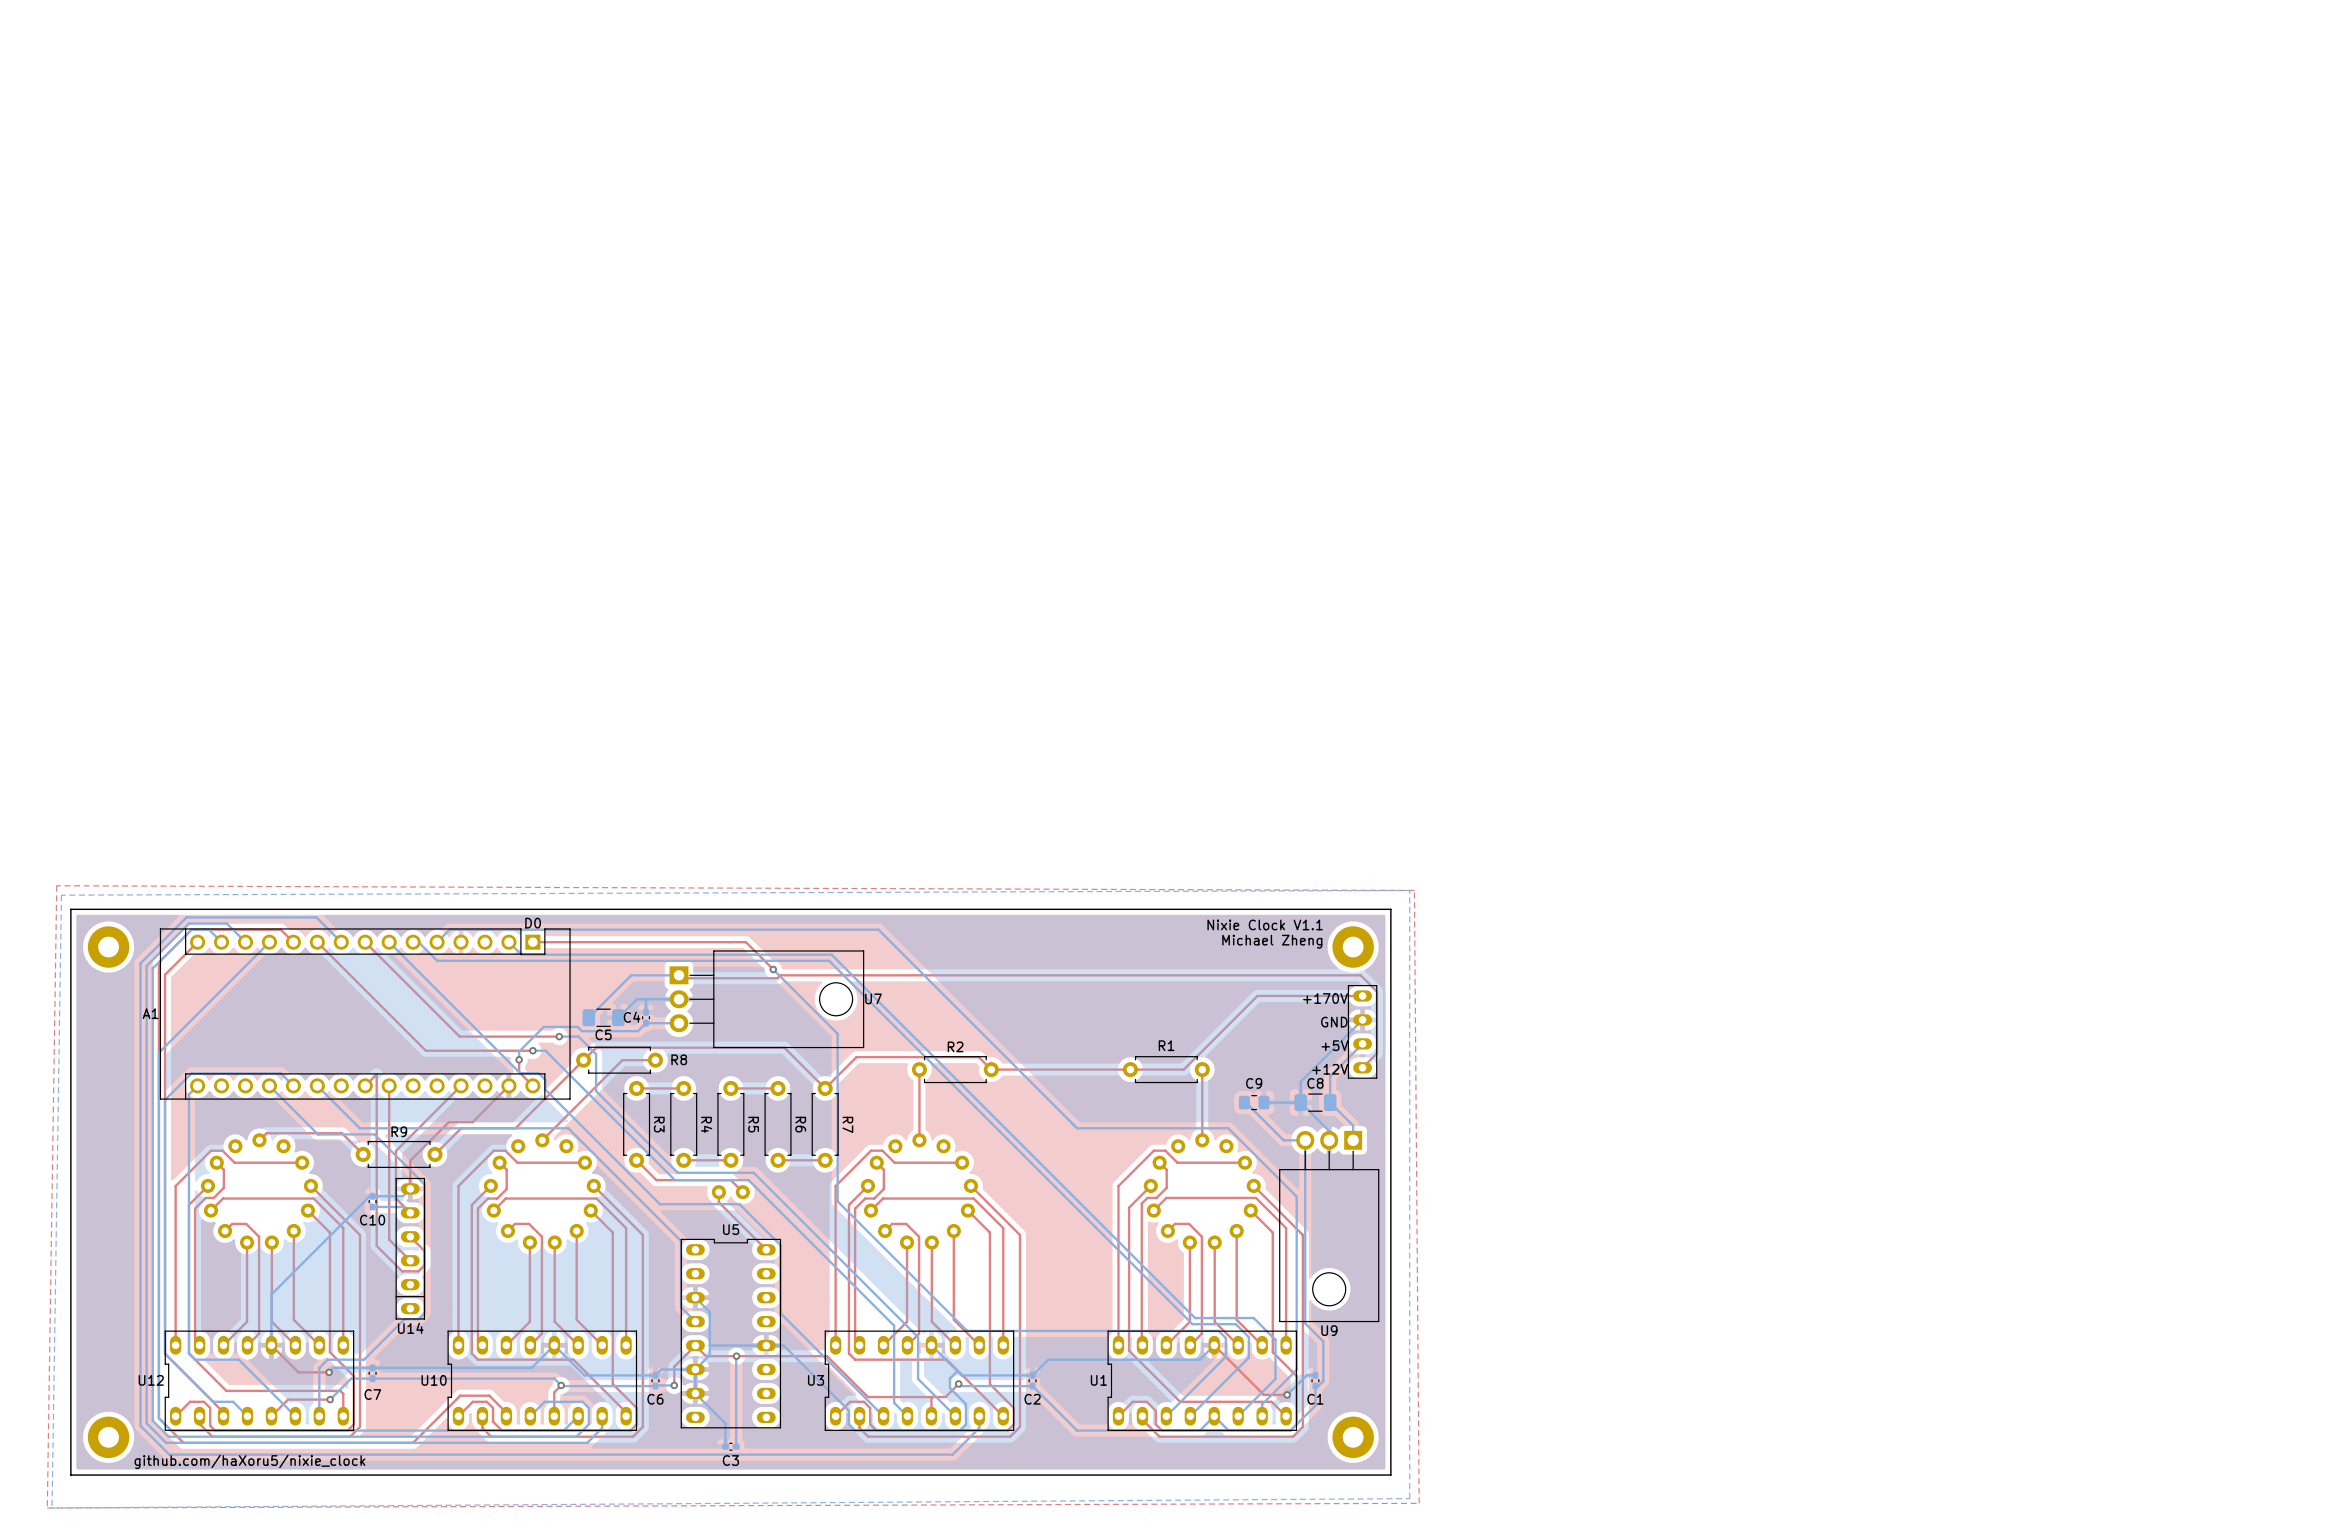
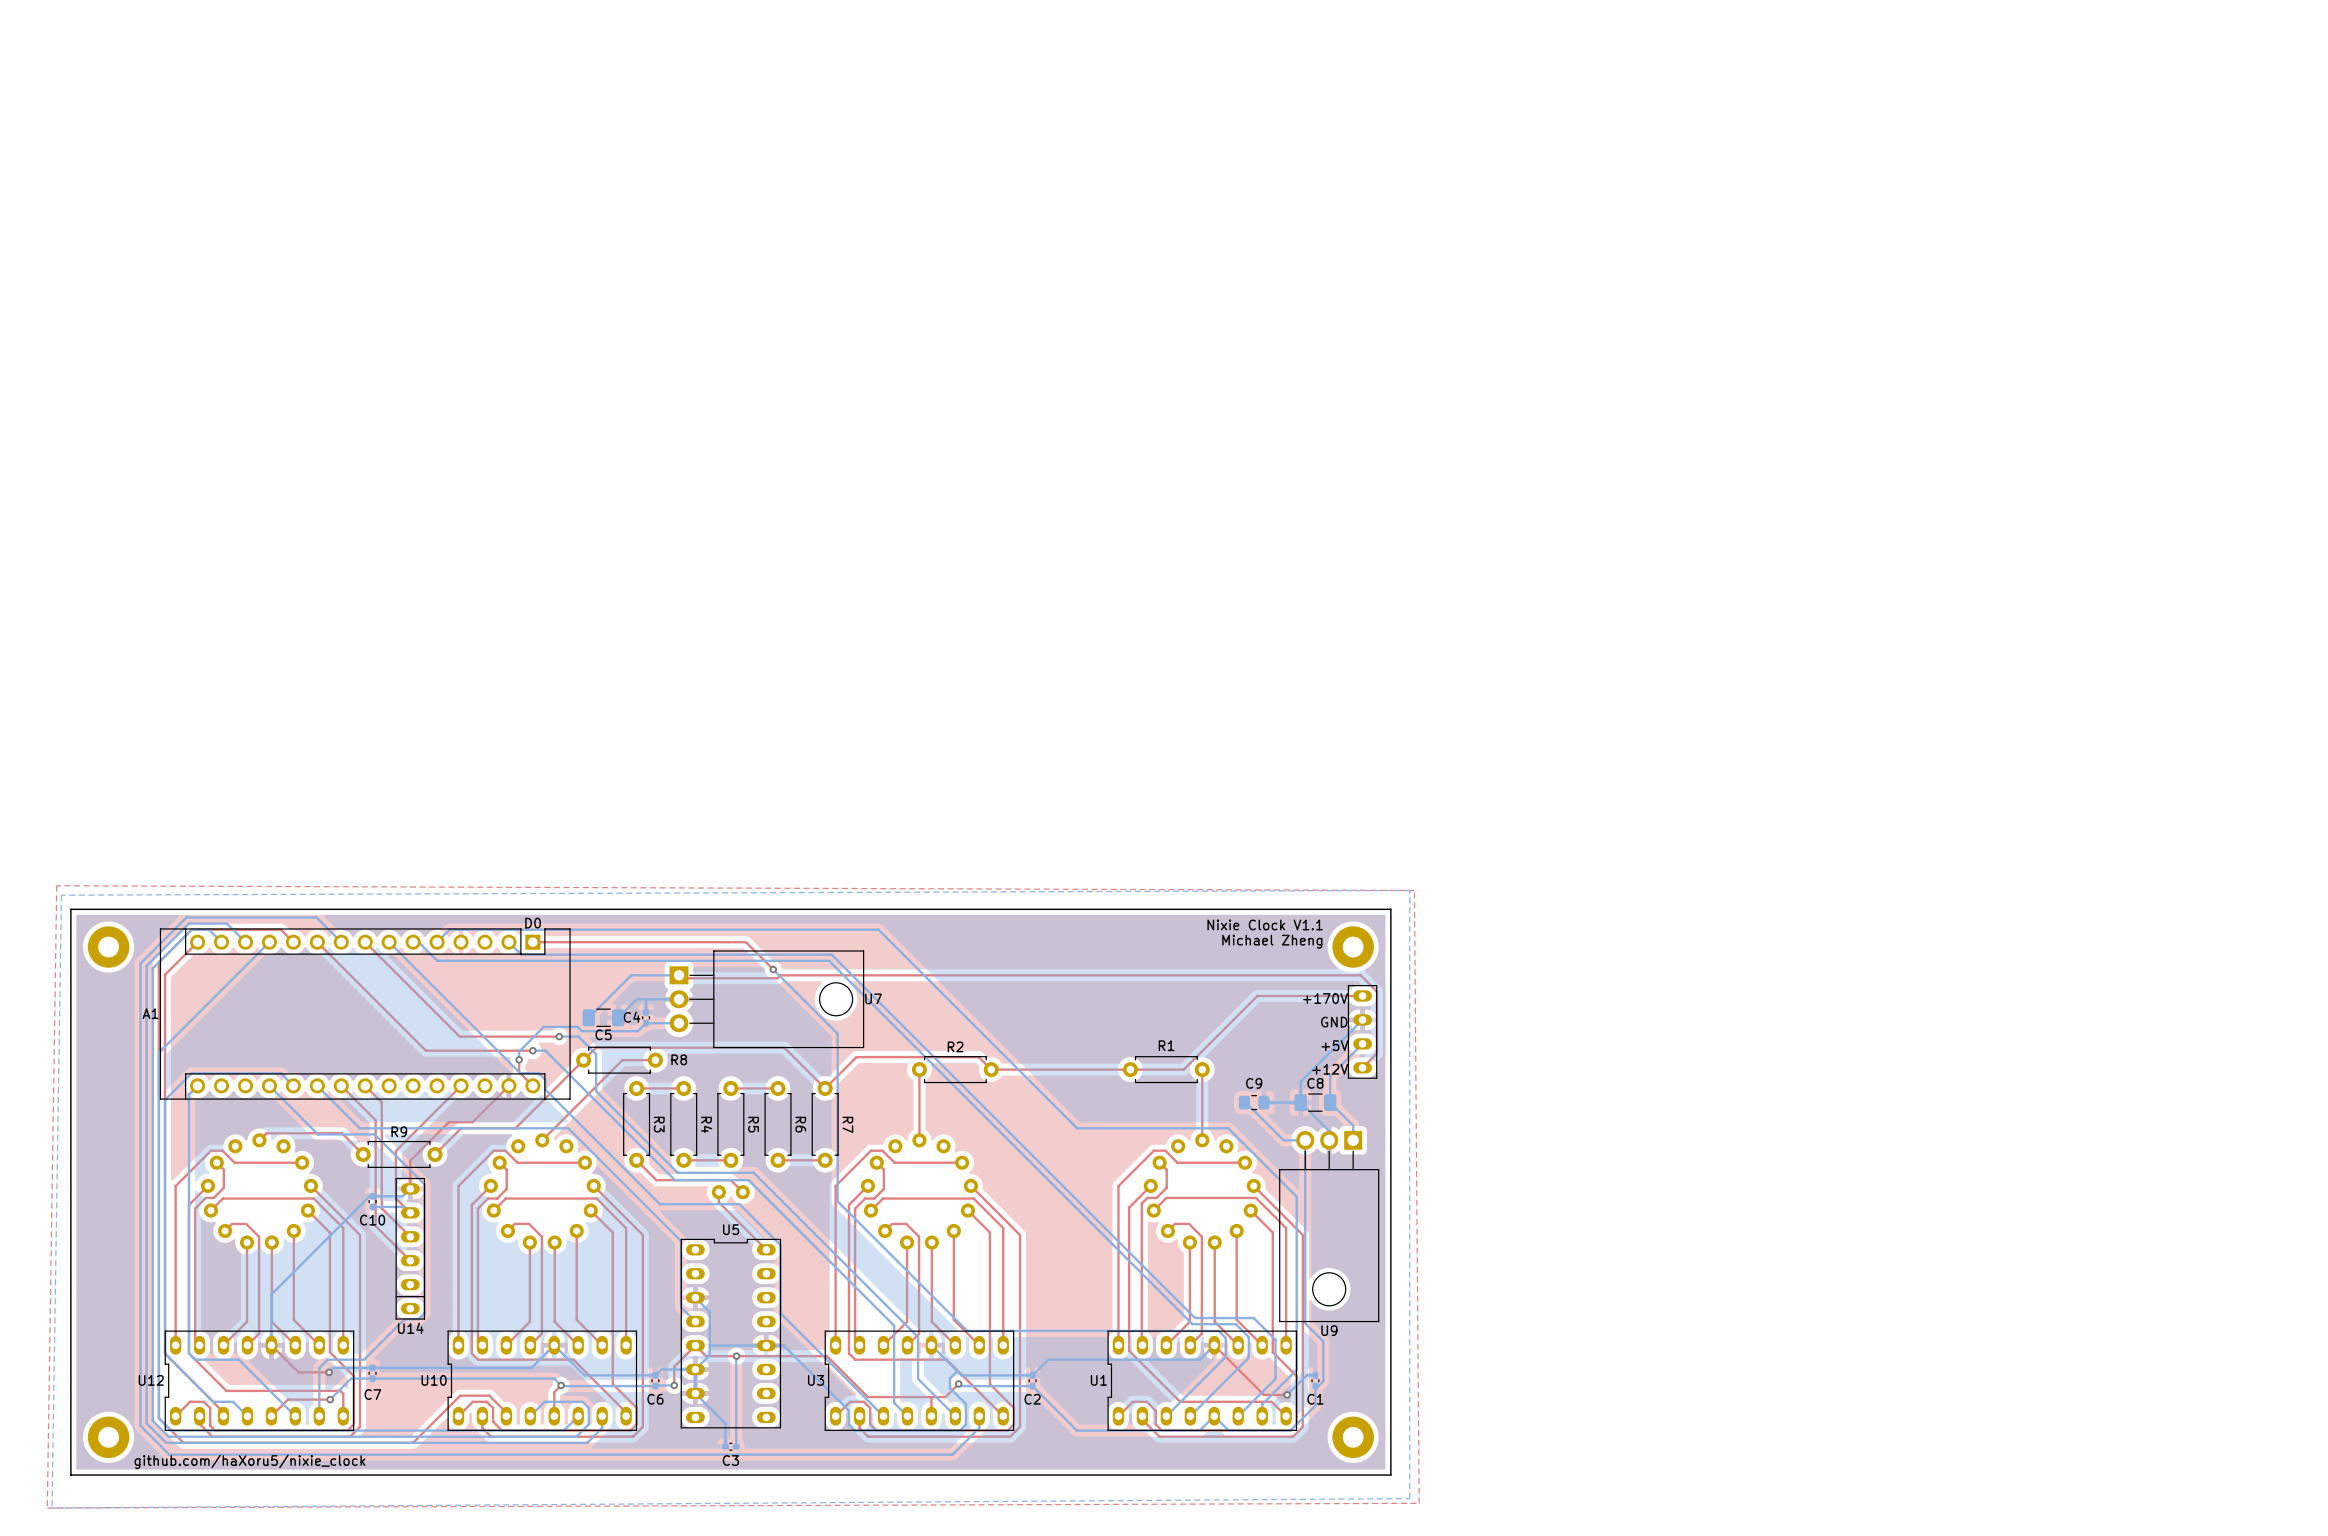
top track: (365, 1085) (376, 1074) (376, 1245) (402, 1271) (418, 1271) (424, 1265) (424, 1251) (410, 1236) -> (365, 1085) (381, 1102) (381, 1208) (410, 1236)
top track: (389, 1085) (389, 1239) -> (341, 1085) (375, 1120) (375, 1226) (389, 1239)

